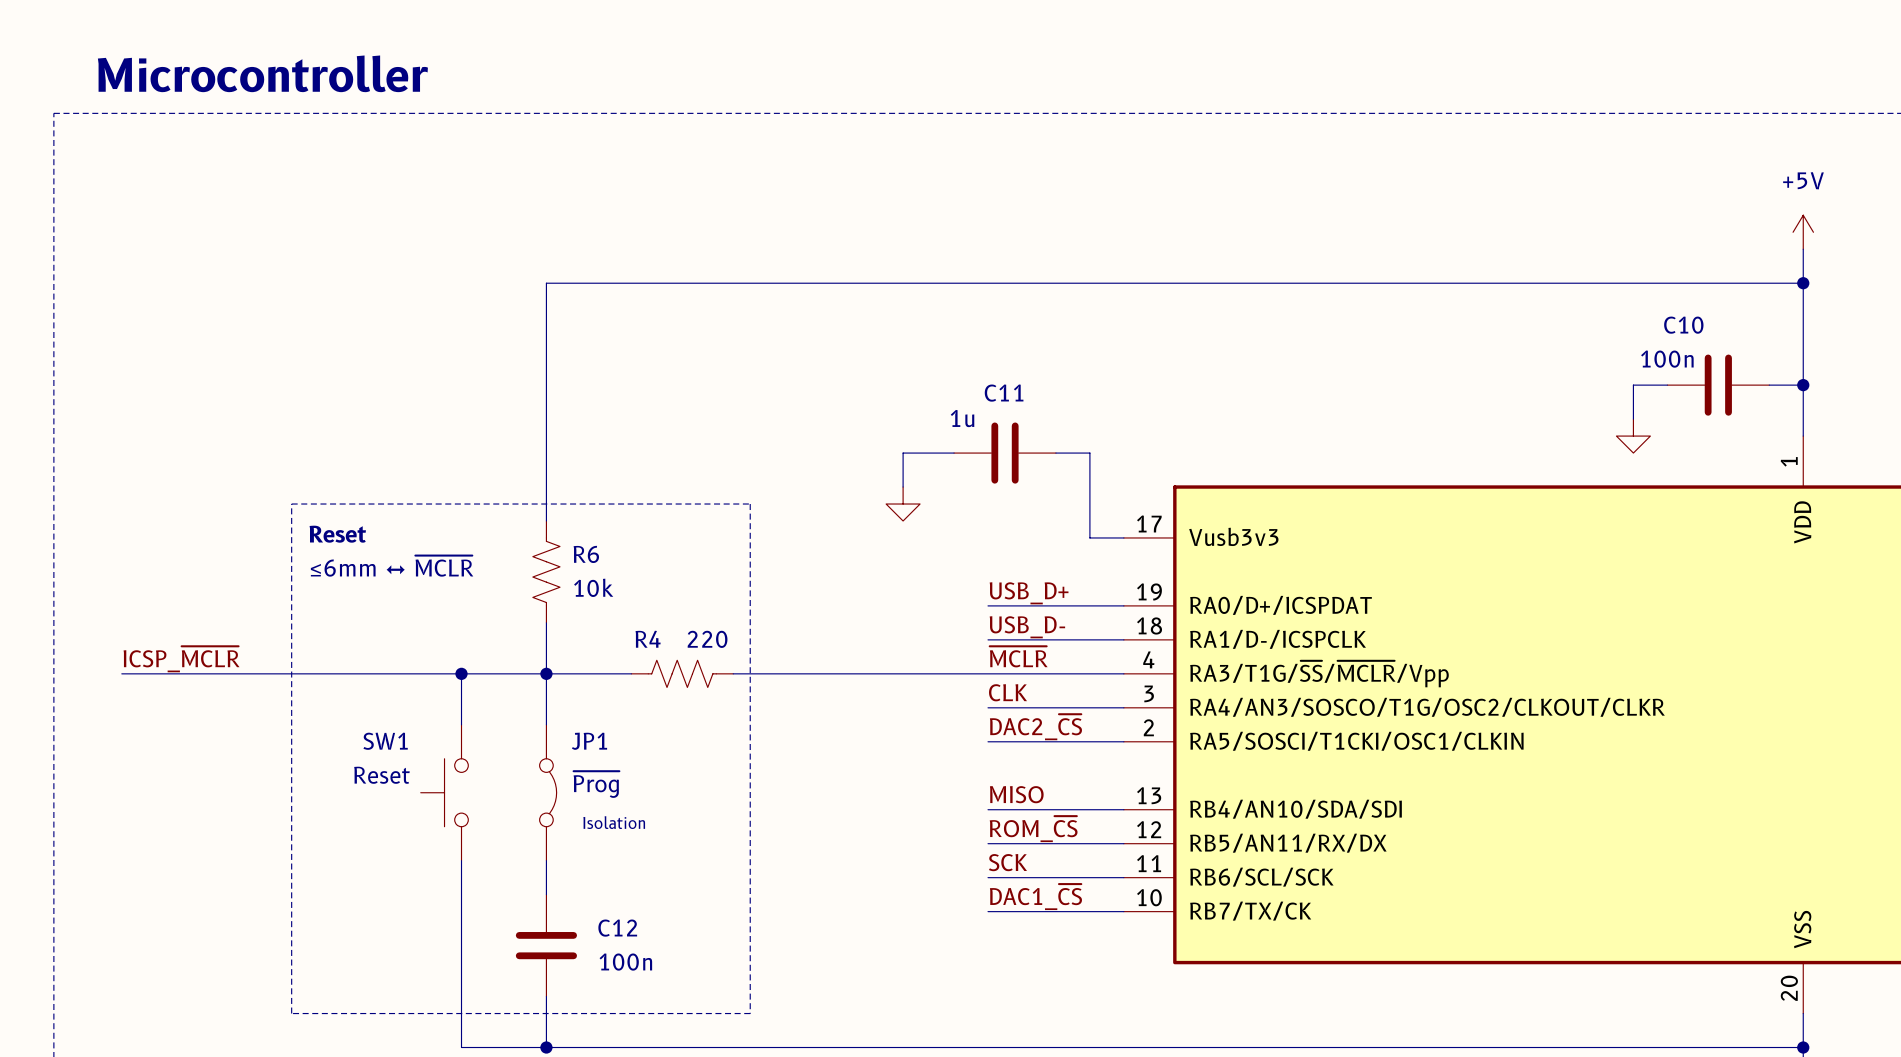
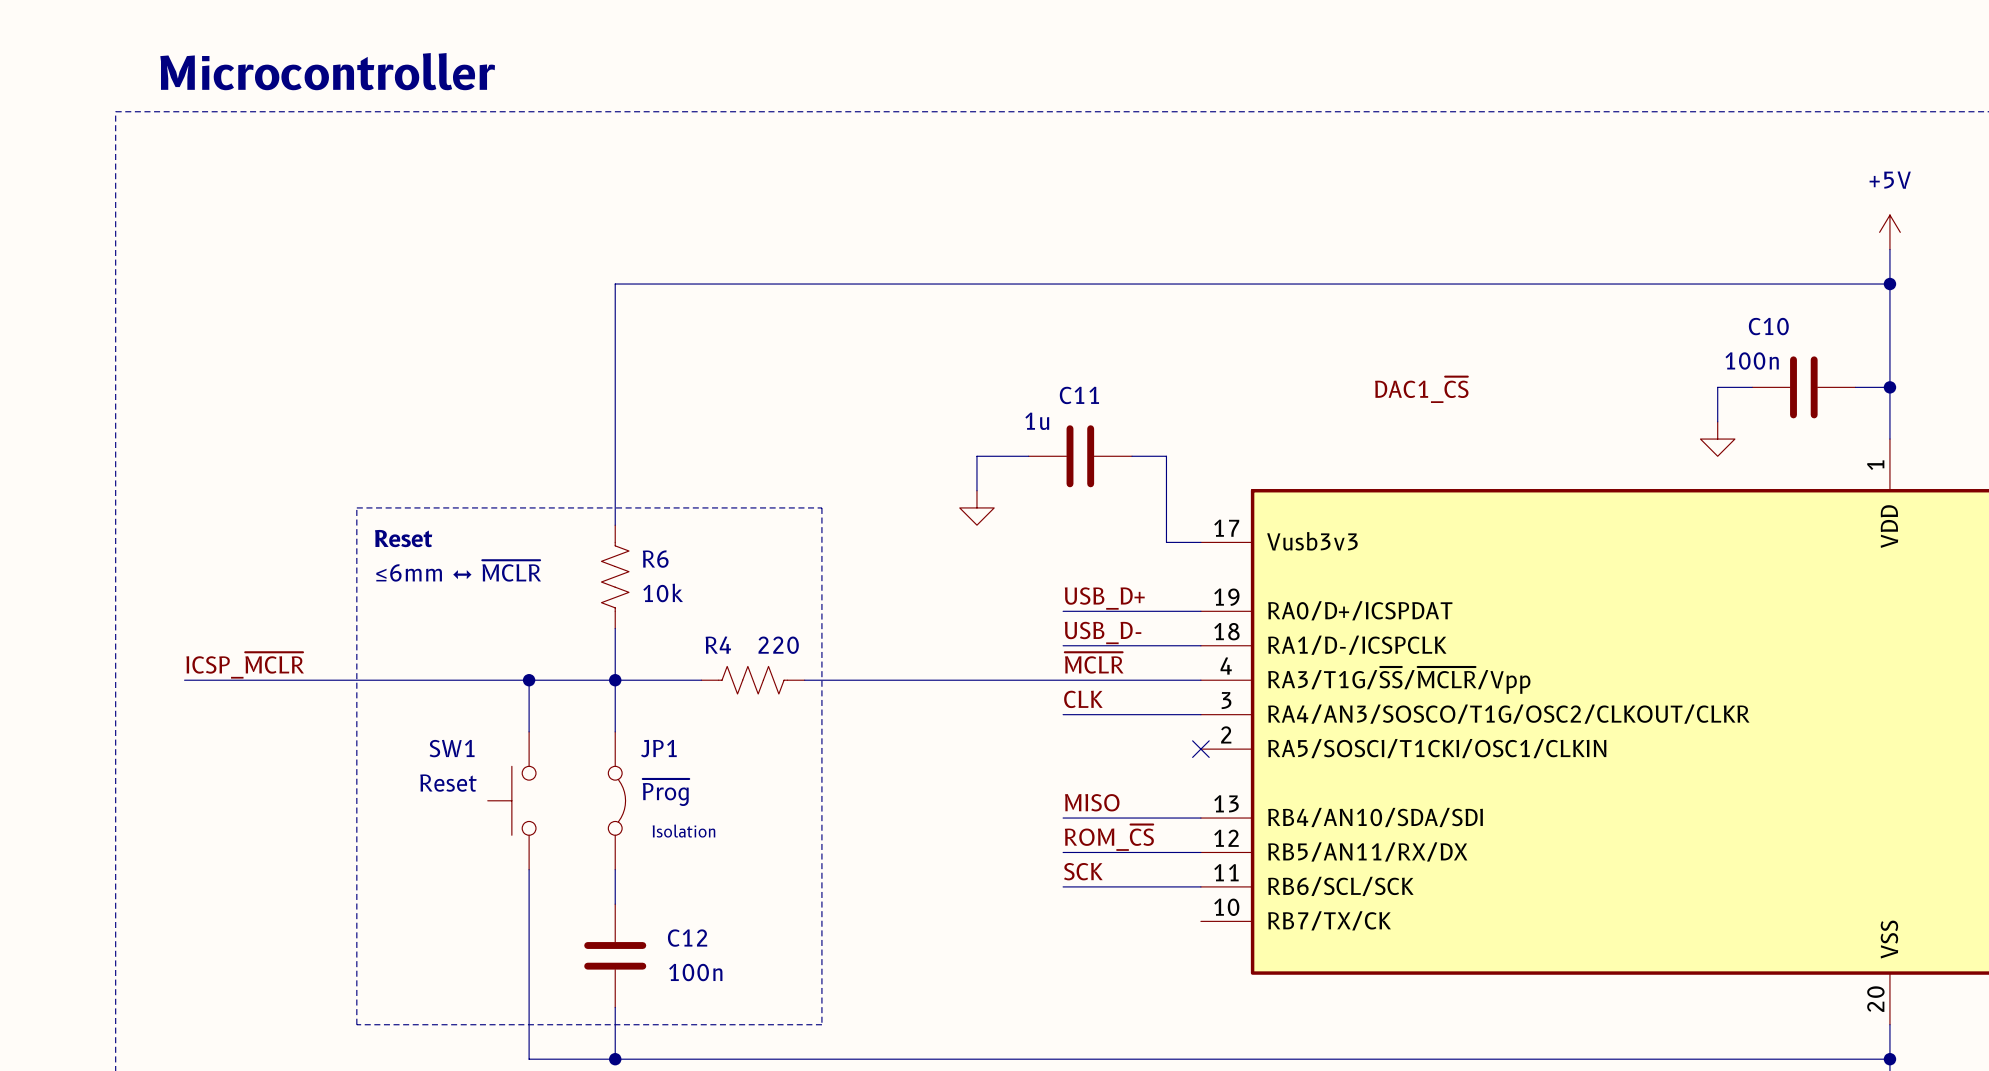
label: none -> DAC1_~{CS} (1421, 389)
label: DAC2_~{CS} (1035, 727) -> none
wire: (988, 741) (1123, 741) -> none
no-connect mark: none -> (1200, 749)
label: DAC1_~{CS} (1035, 897) -> none
wire: (988, 911) (1123, 911) -> none

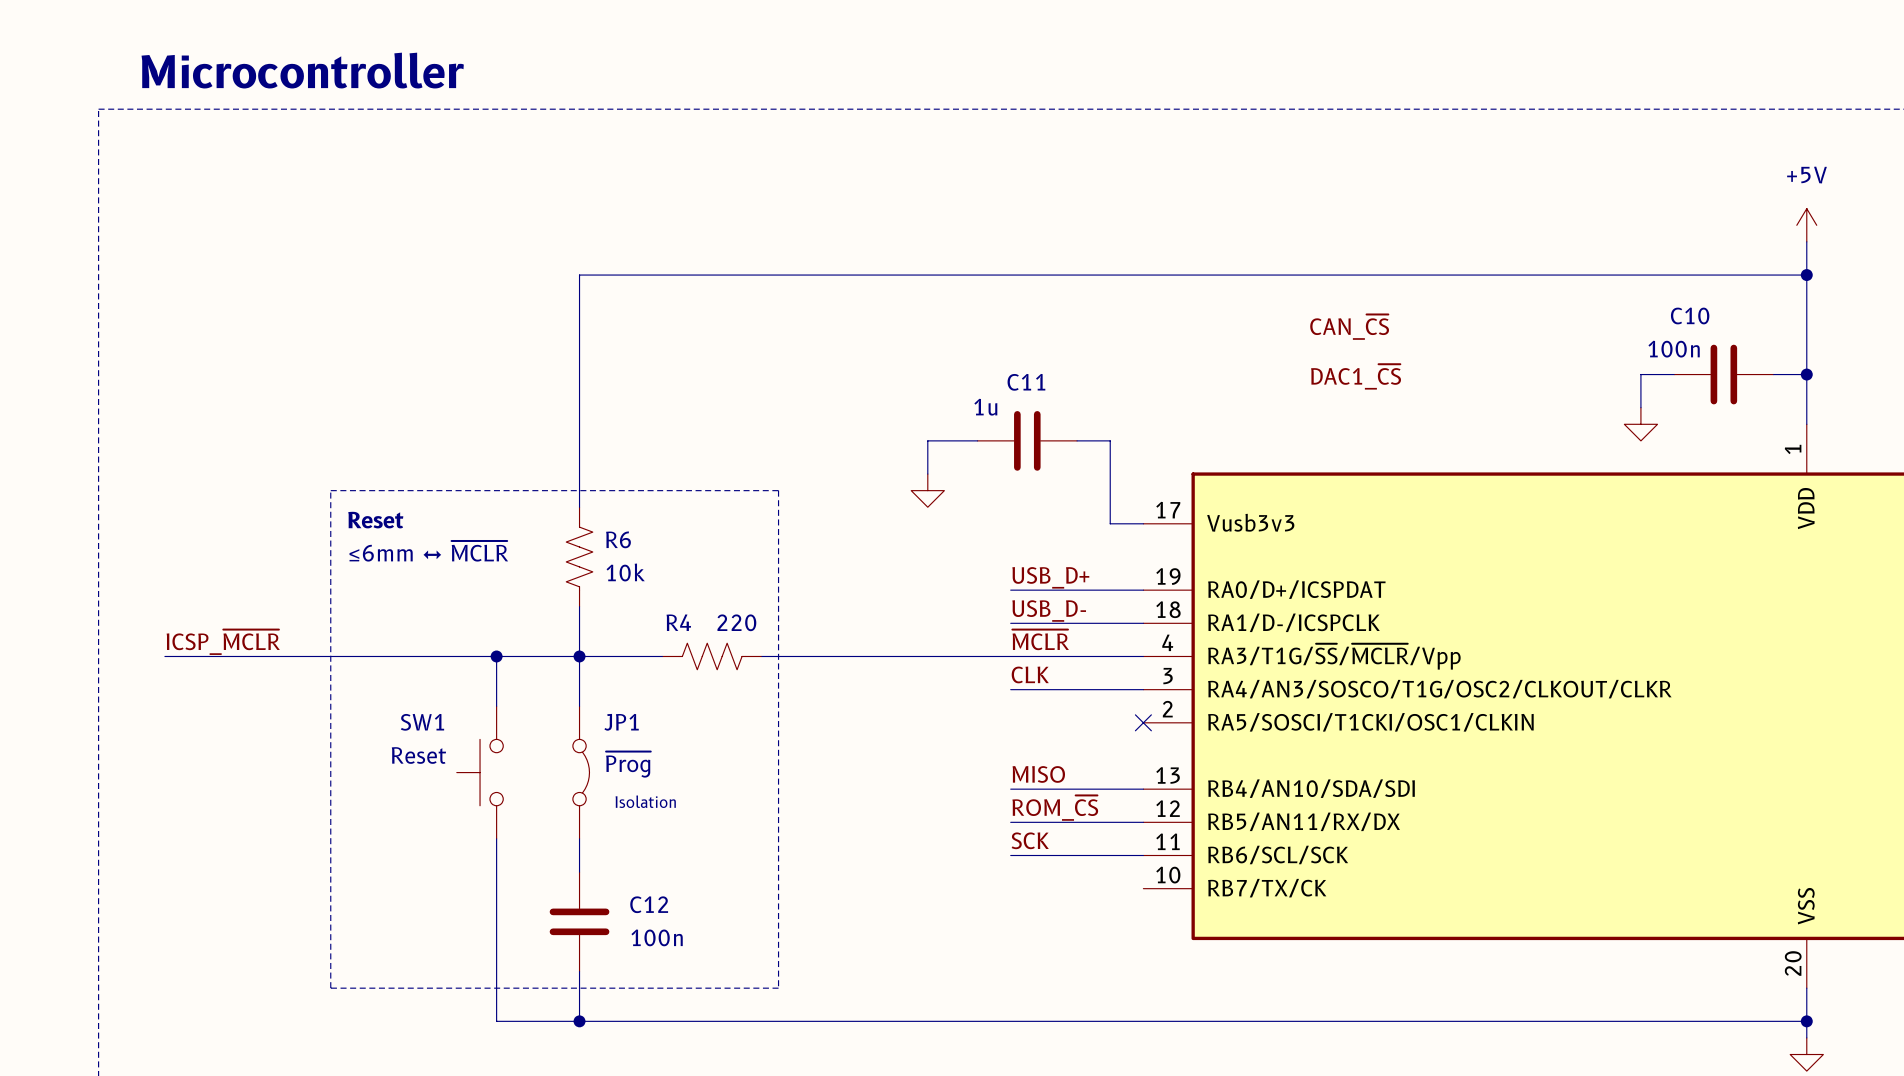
label: none -> CAN_~{CS} (1349, 327)

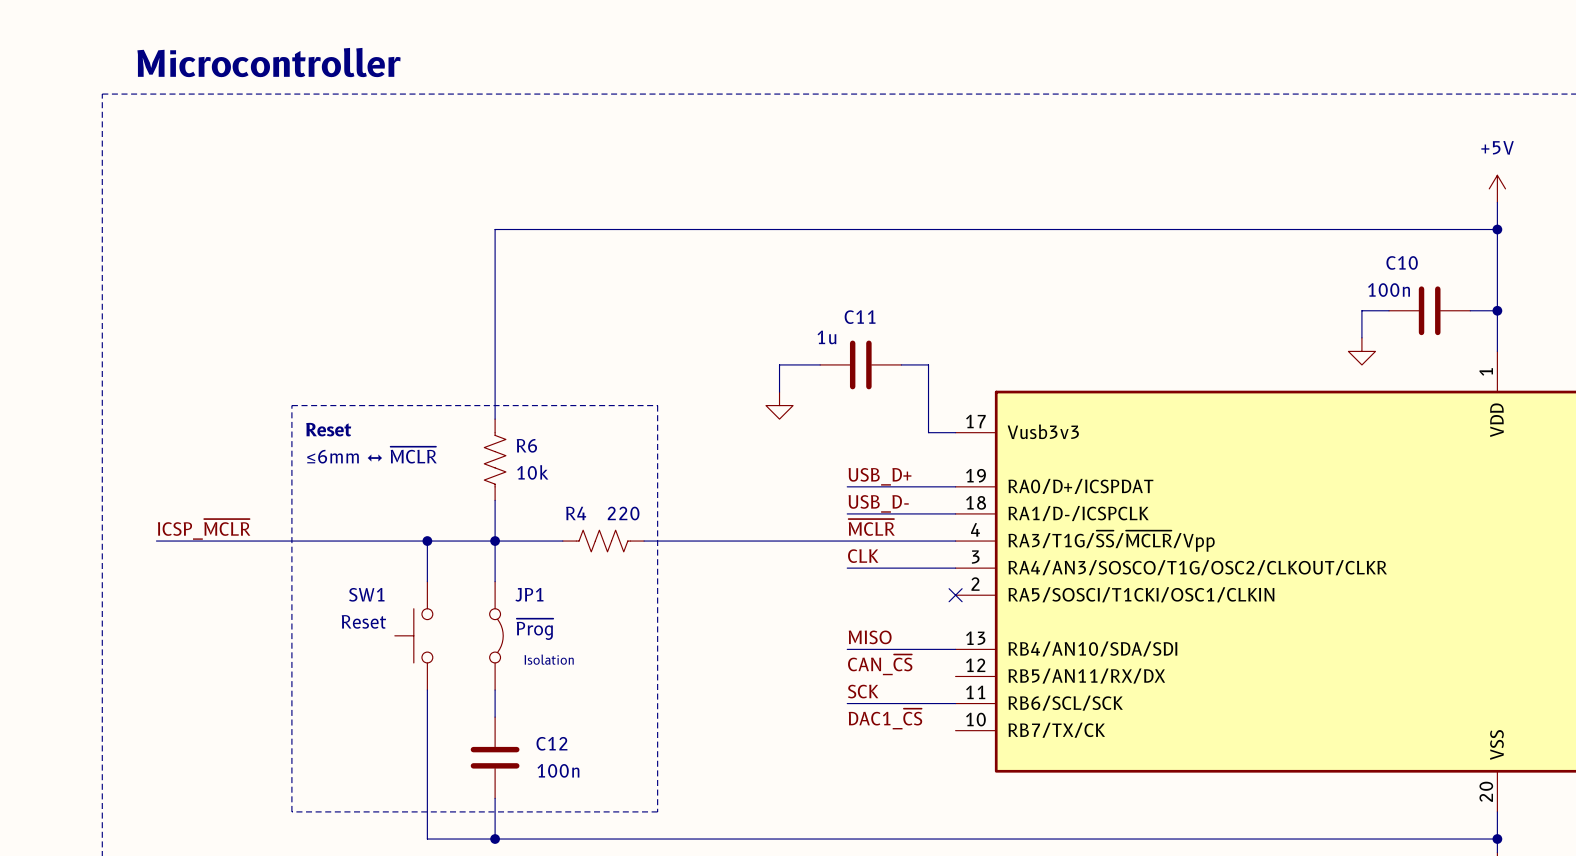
label: CAN_~{CS} (1349, 327) -> none
label: DAC1_~{CS} (1356, 376) -> none
label: ROM_~{CS} (1055, 808) -> CAN_~{CS} (880, 664)
wire: (1010, 822) (1143, 822) -> none
label: none -> DAC1_~{CS} (885, 719)

